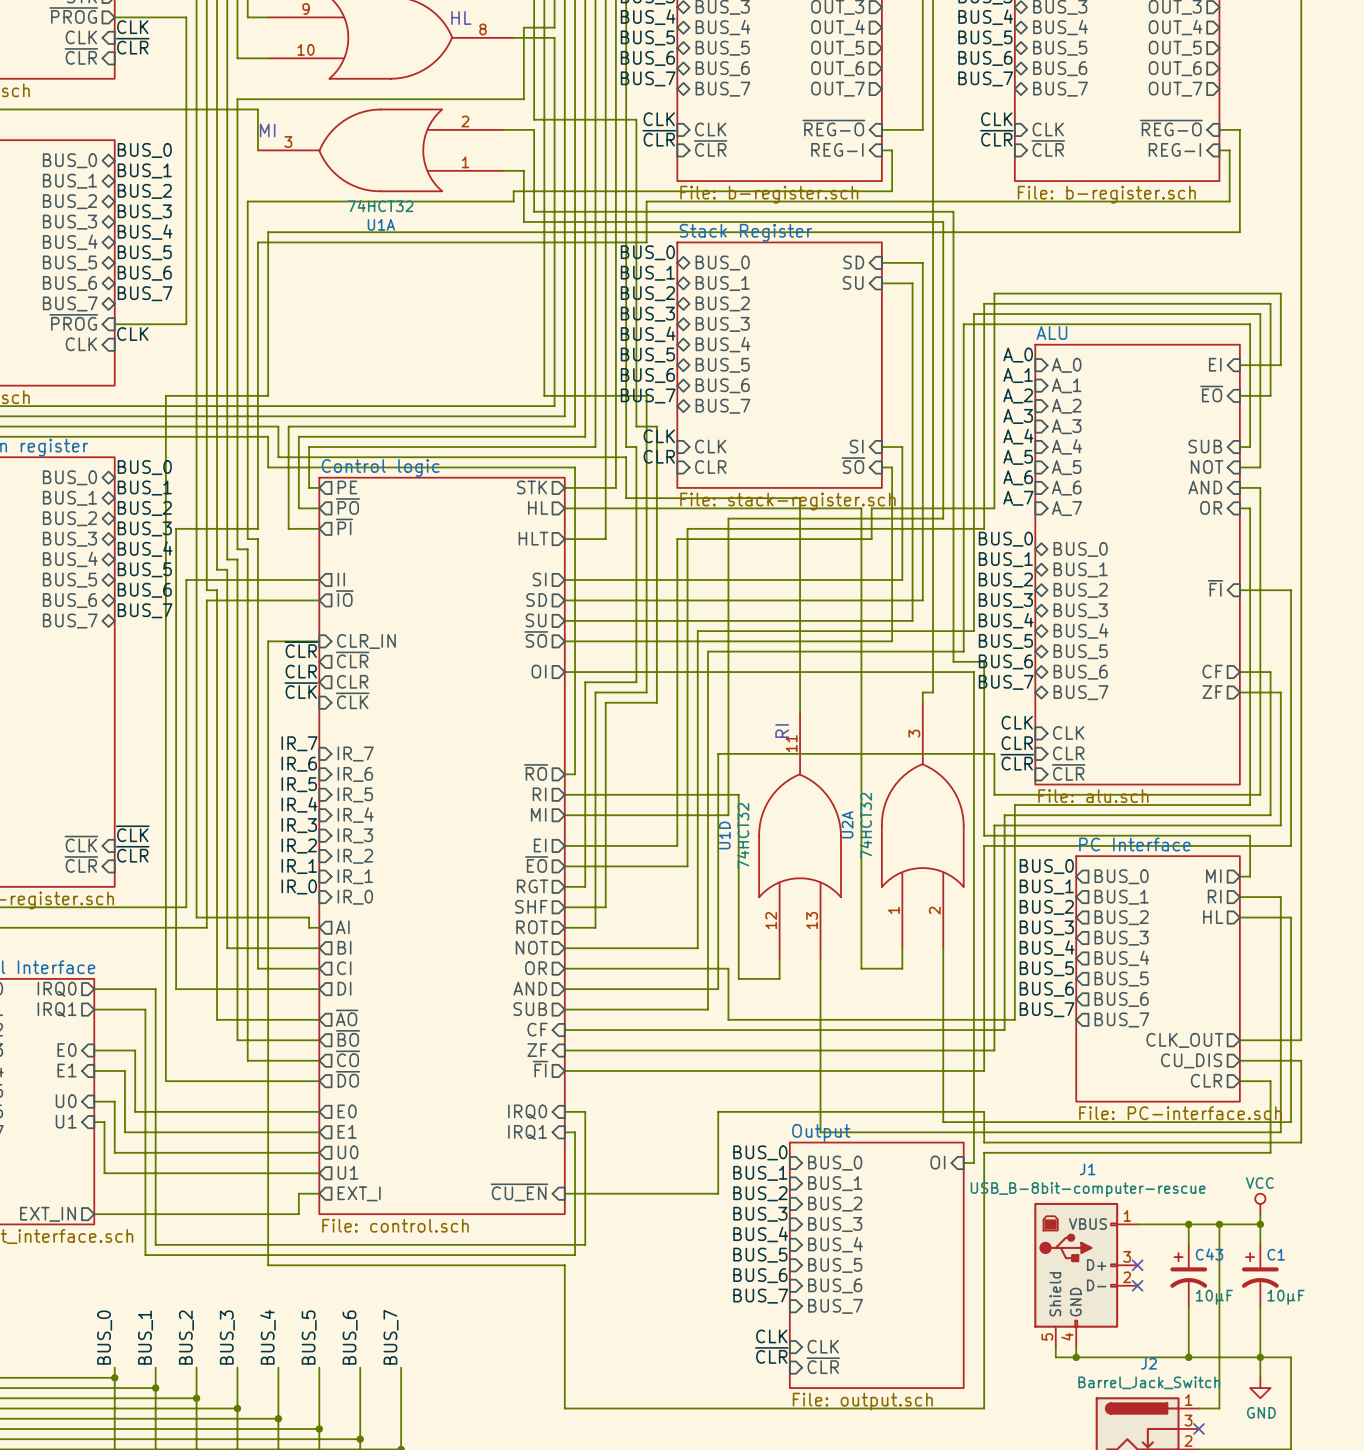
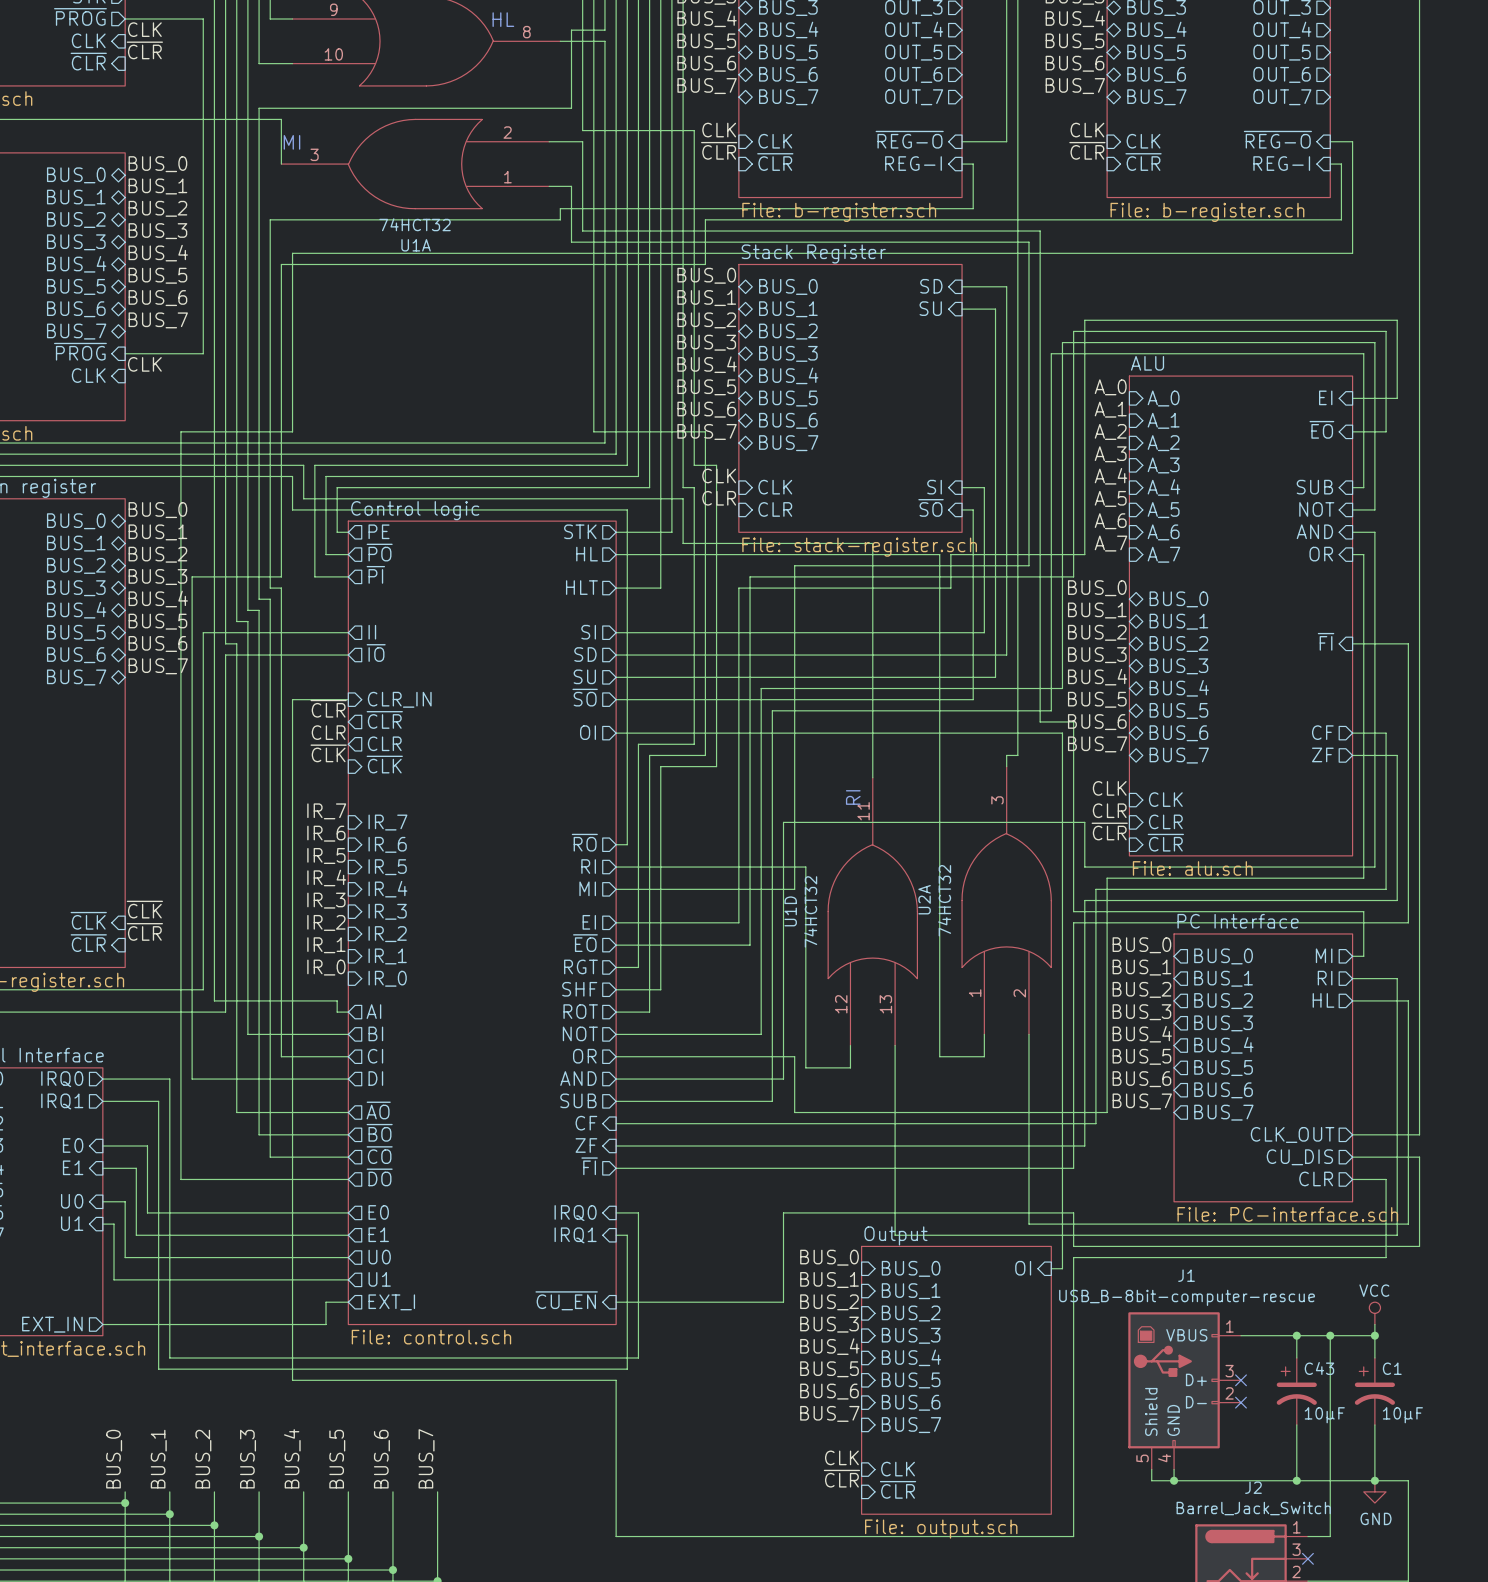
power symbol position: GND (1260, 1388) -> GND (1374, 1491)

